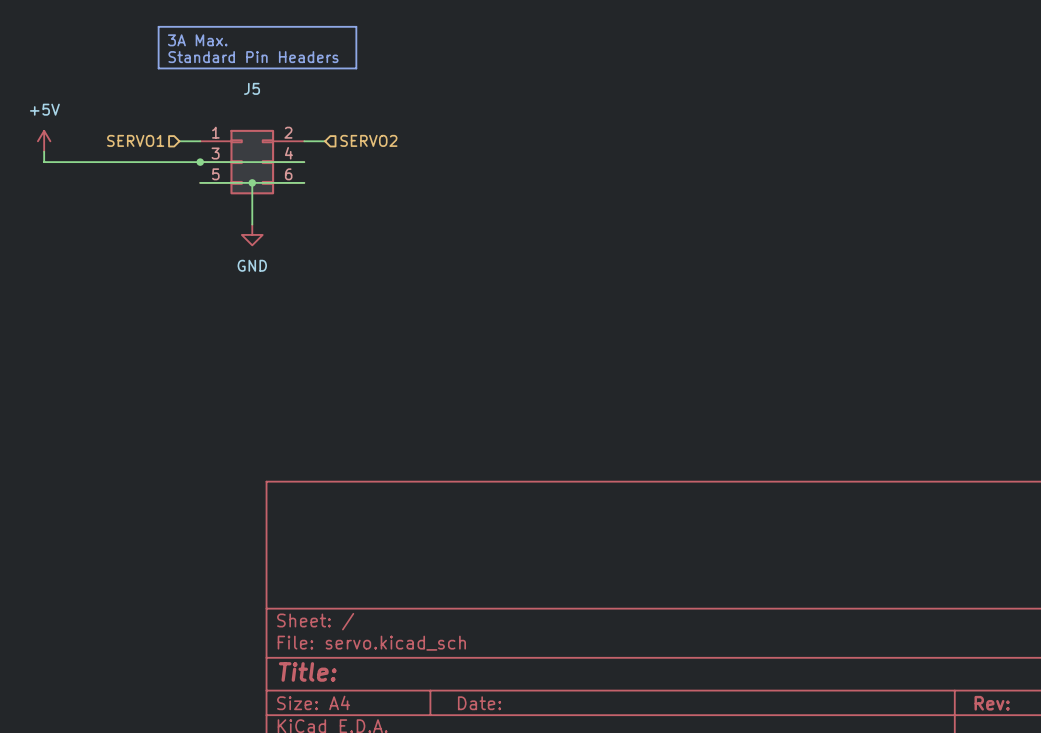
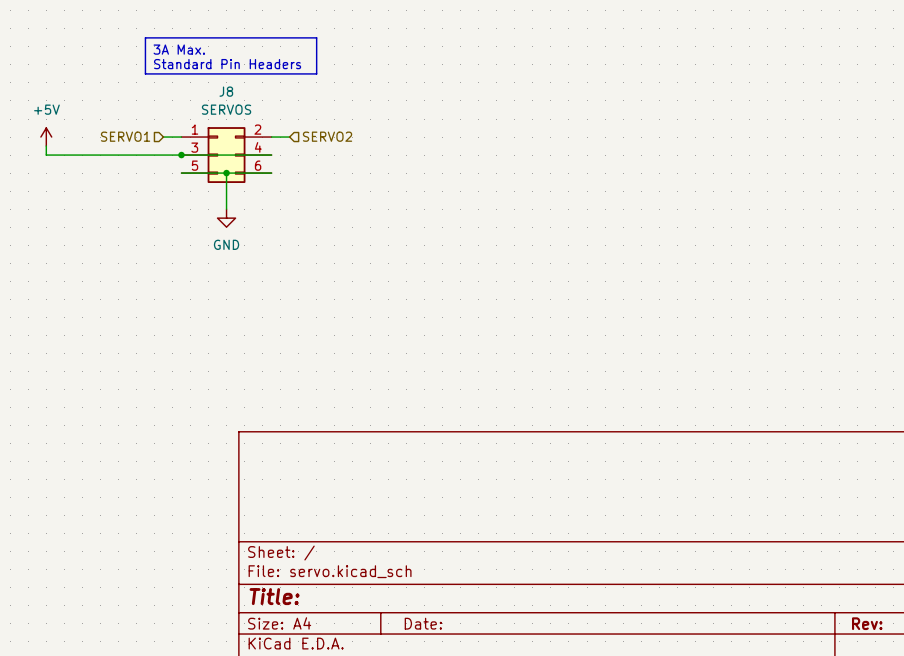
J5 name: J5 (252, 88) -> J8 (226, 91)
J5 value: none -> SERVOS (226, 109)

